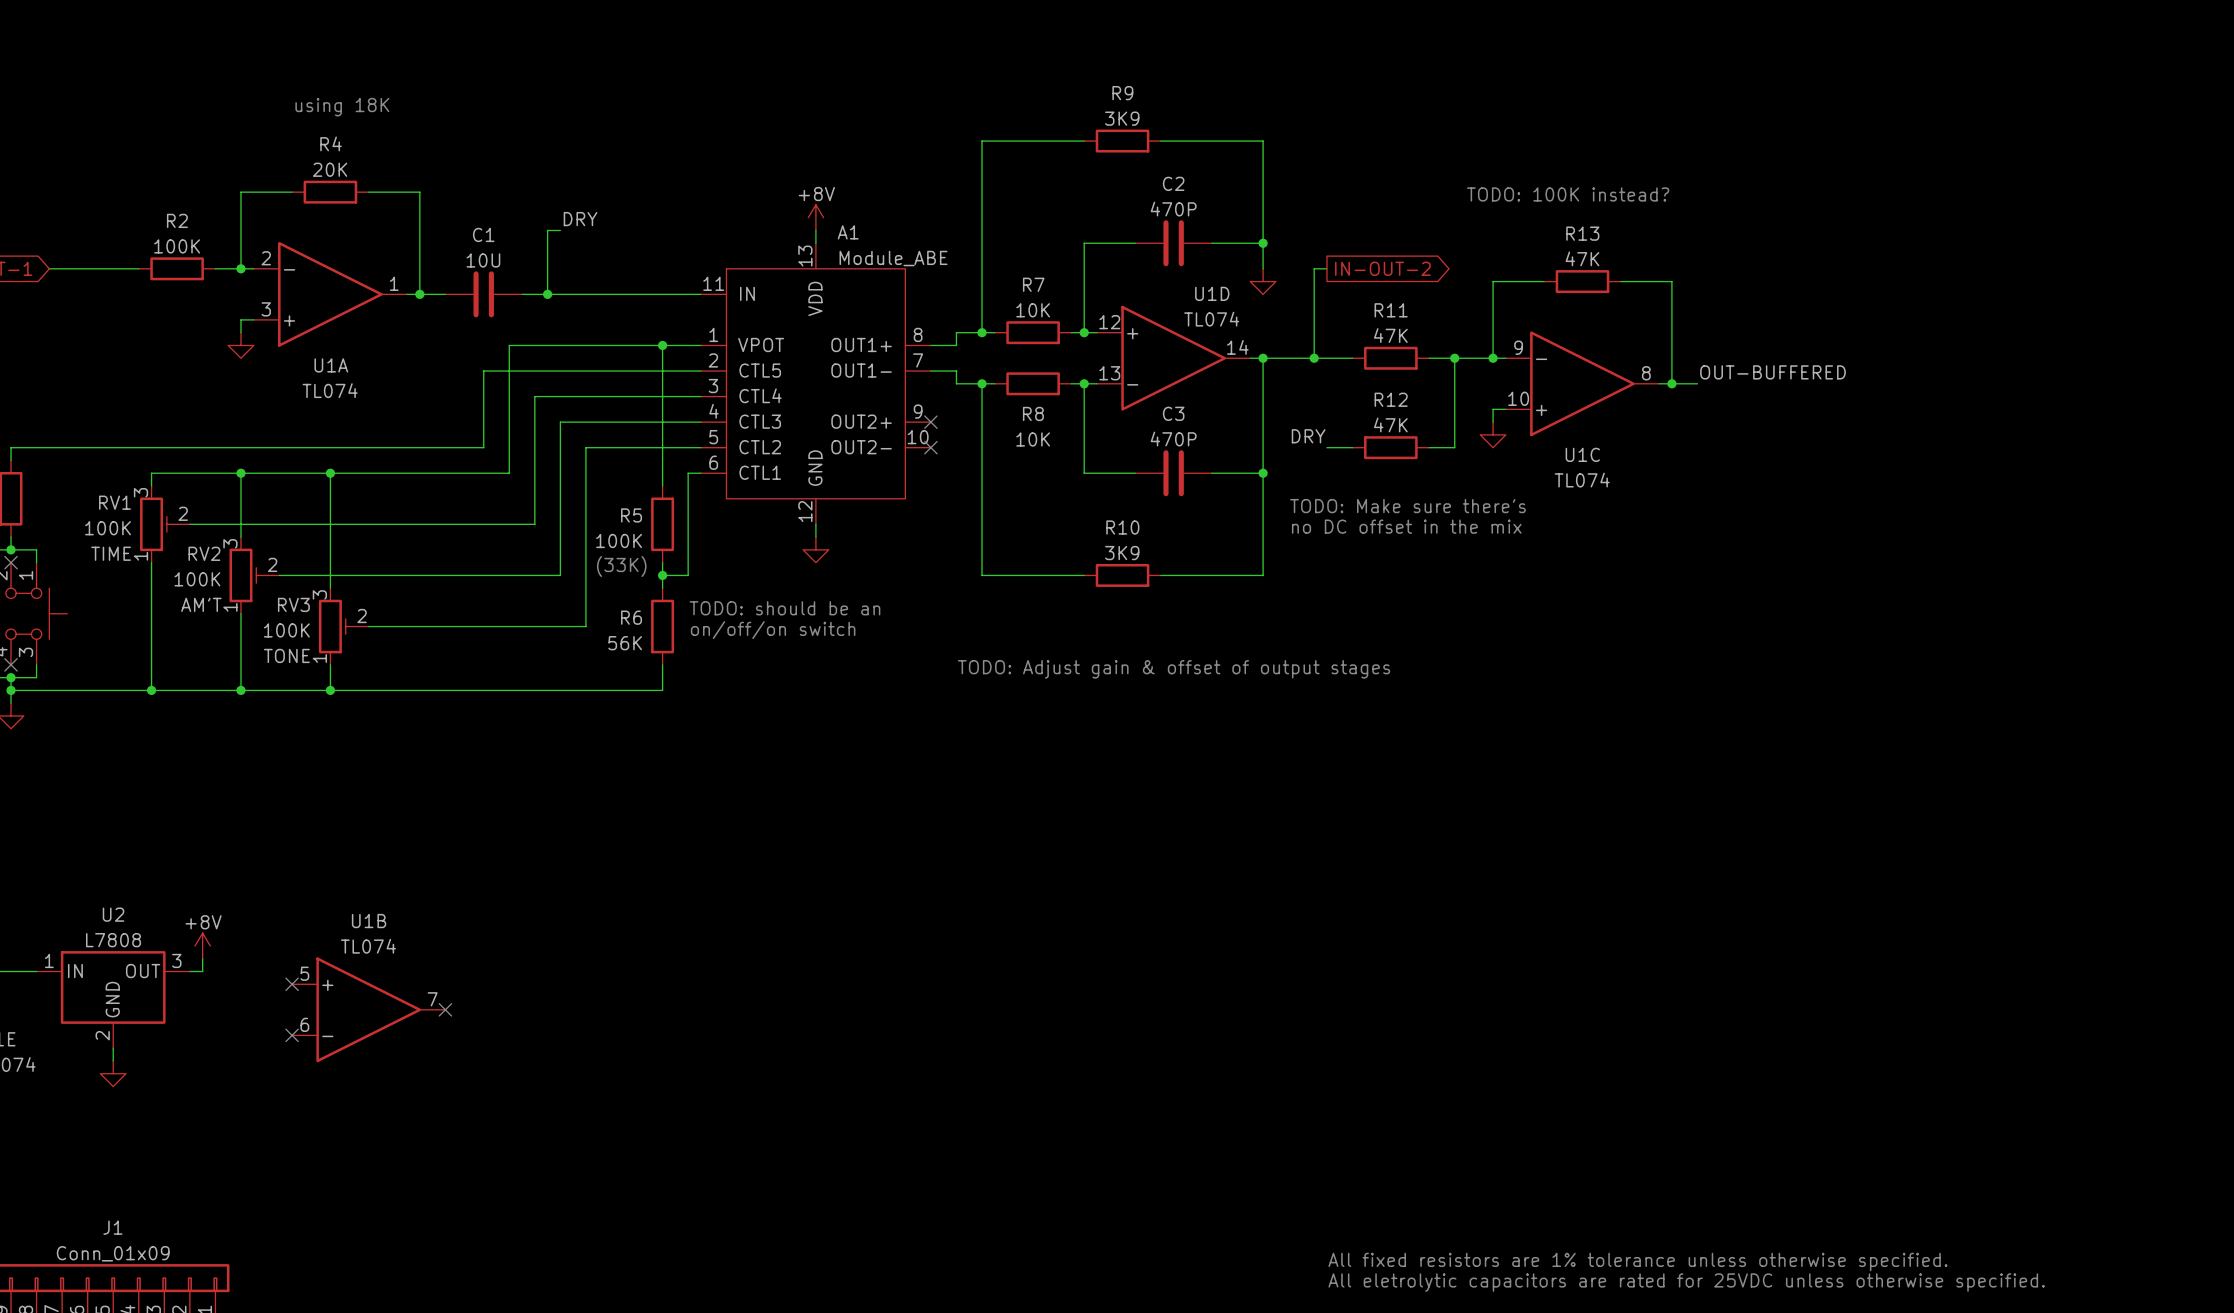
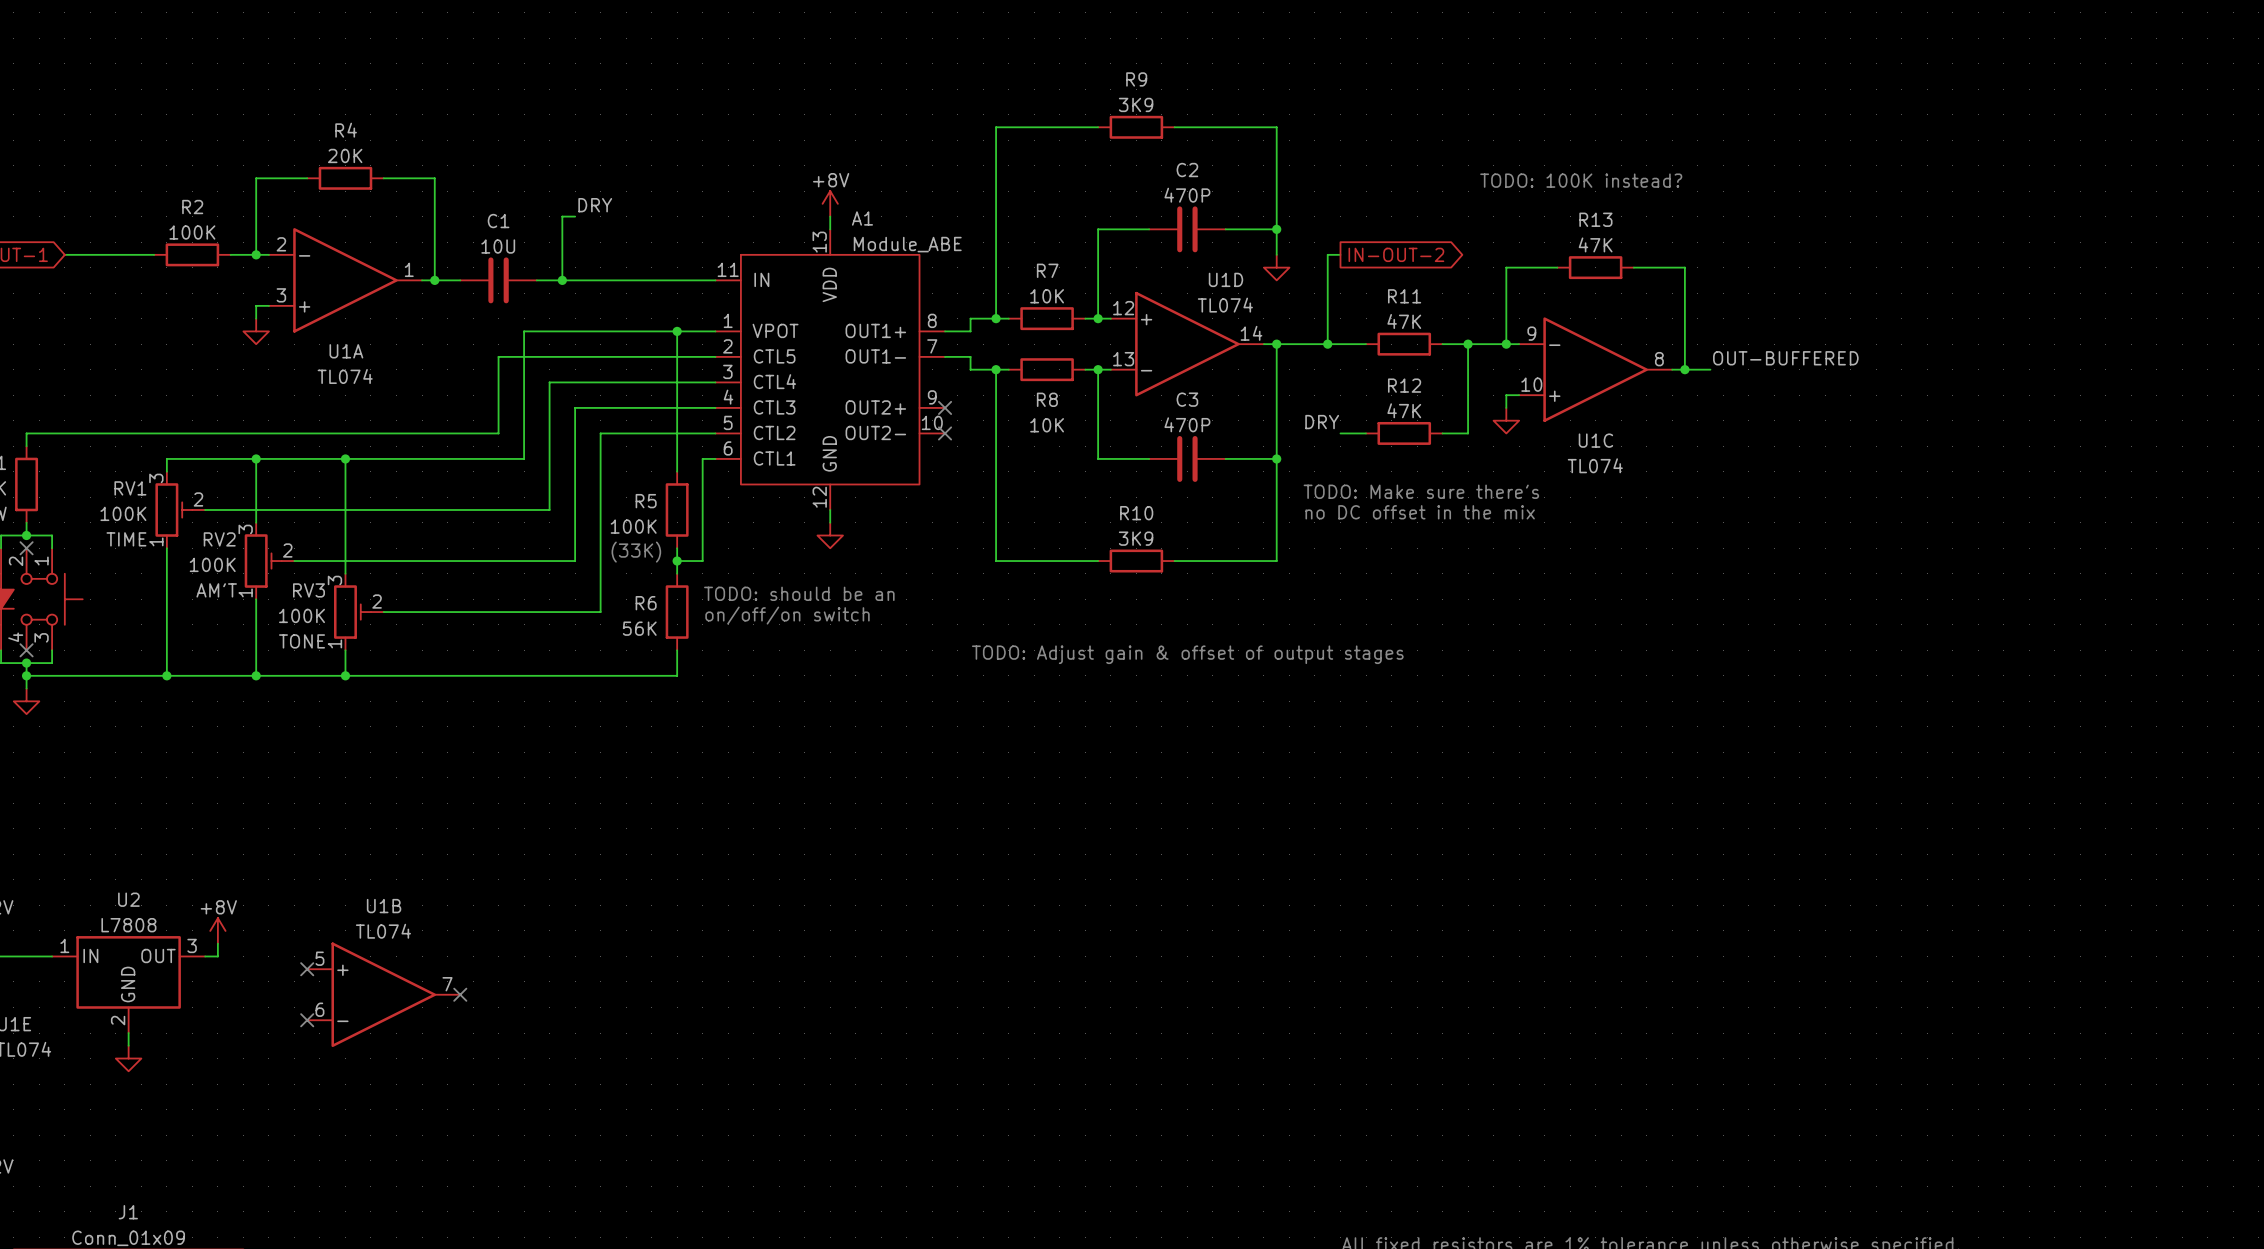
text: using 18K (342, 107) -> none

